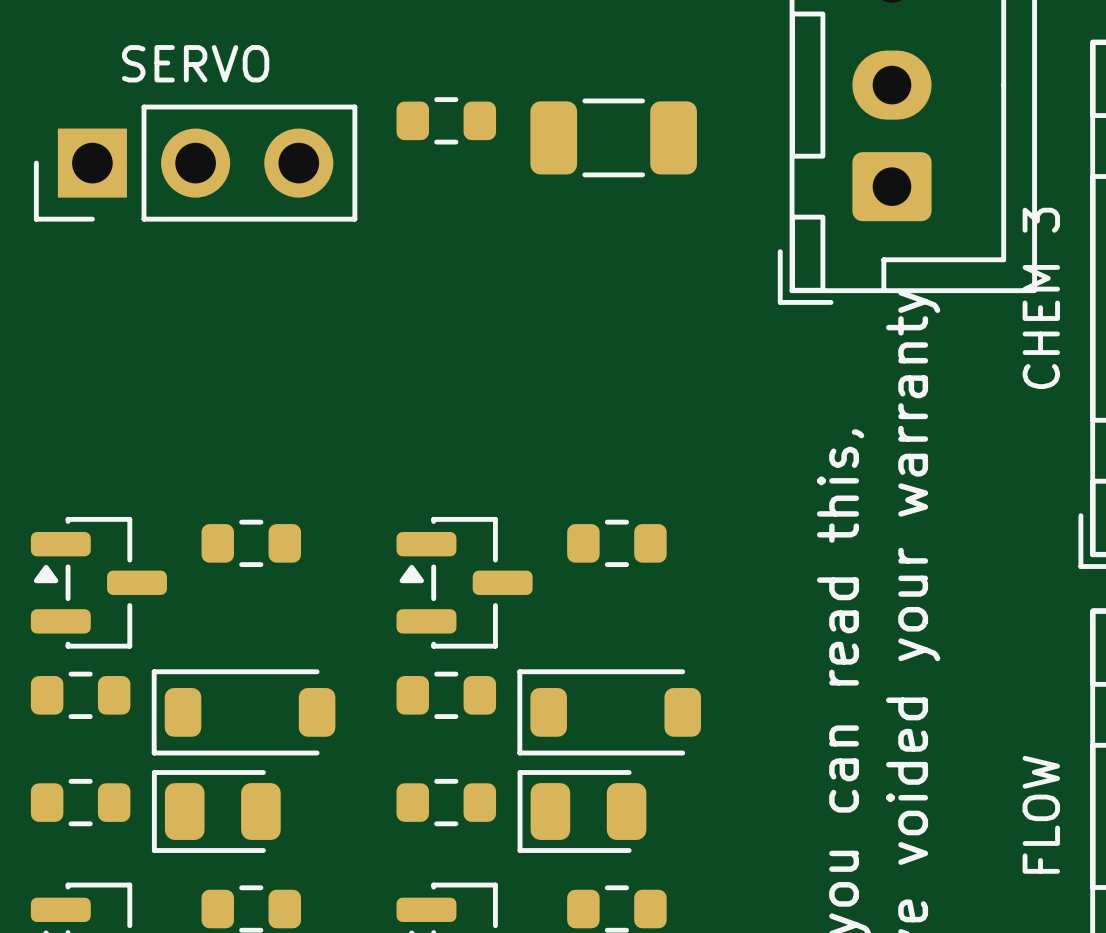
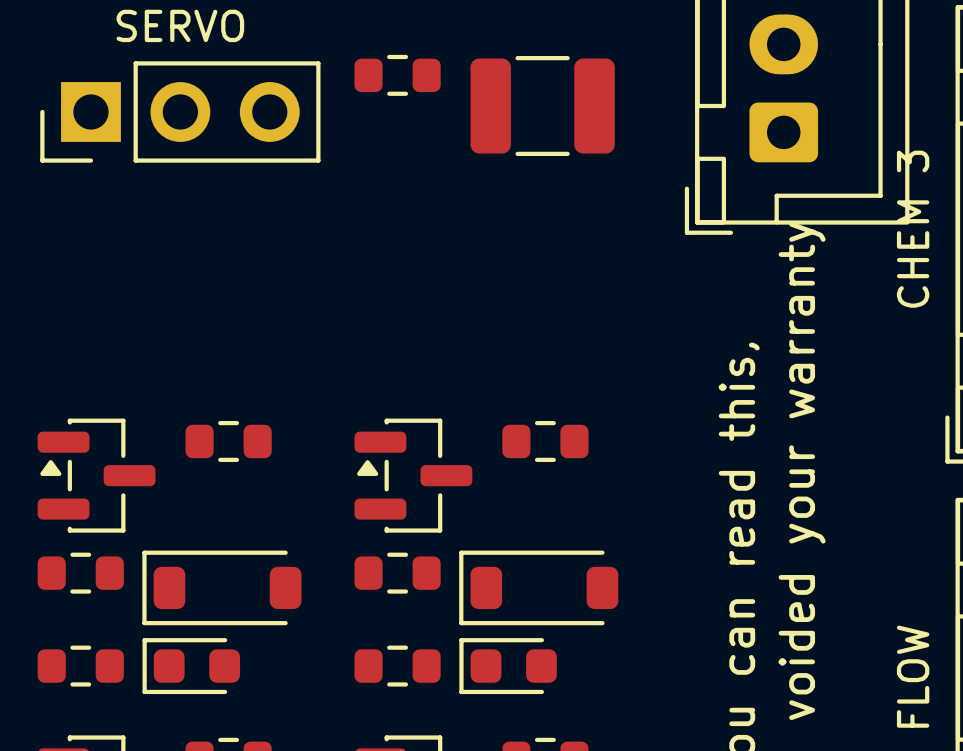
part footprint: [530, 98, 697, 178] -> [470, 56, 615, 156]
part footprint: [151, 770, 281, 853] -> [142, 638, 241, 695]
part footprint: [517, 770, 647, 853] -> [459, 638, 557, 695]

